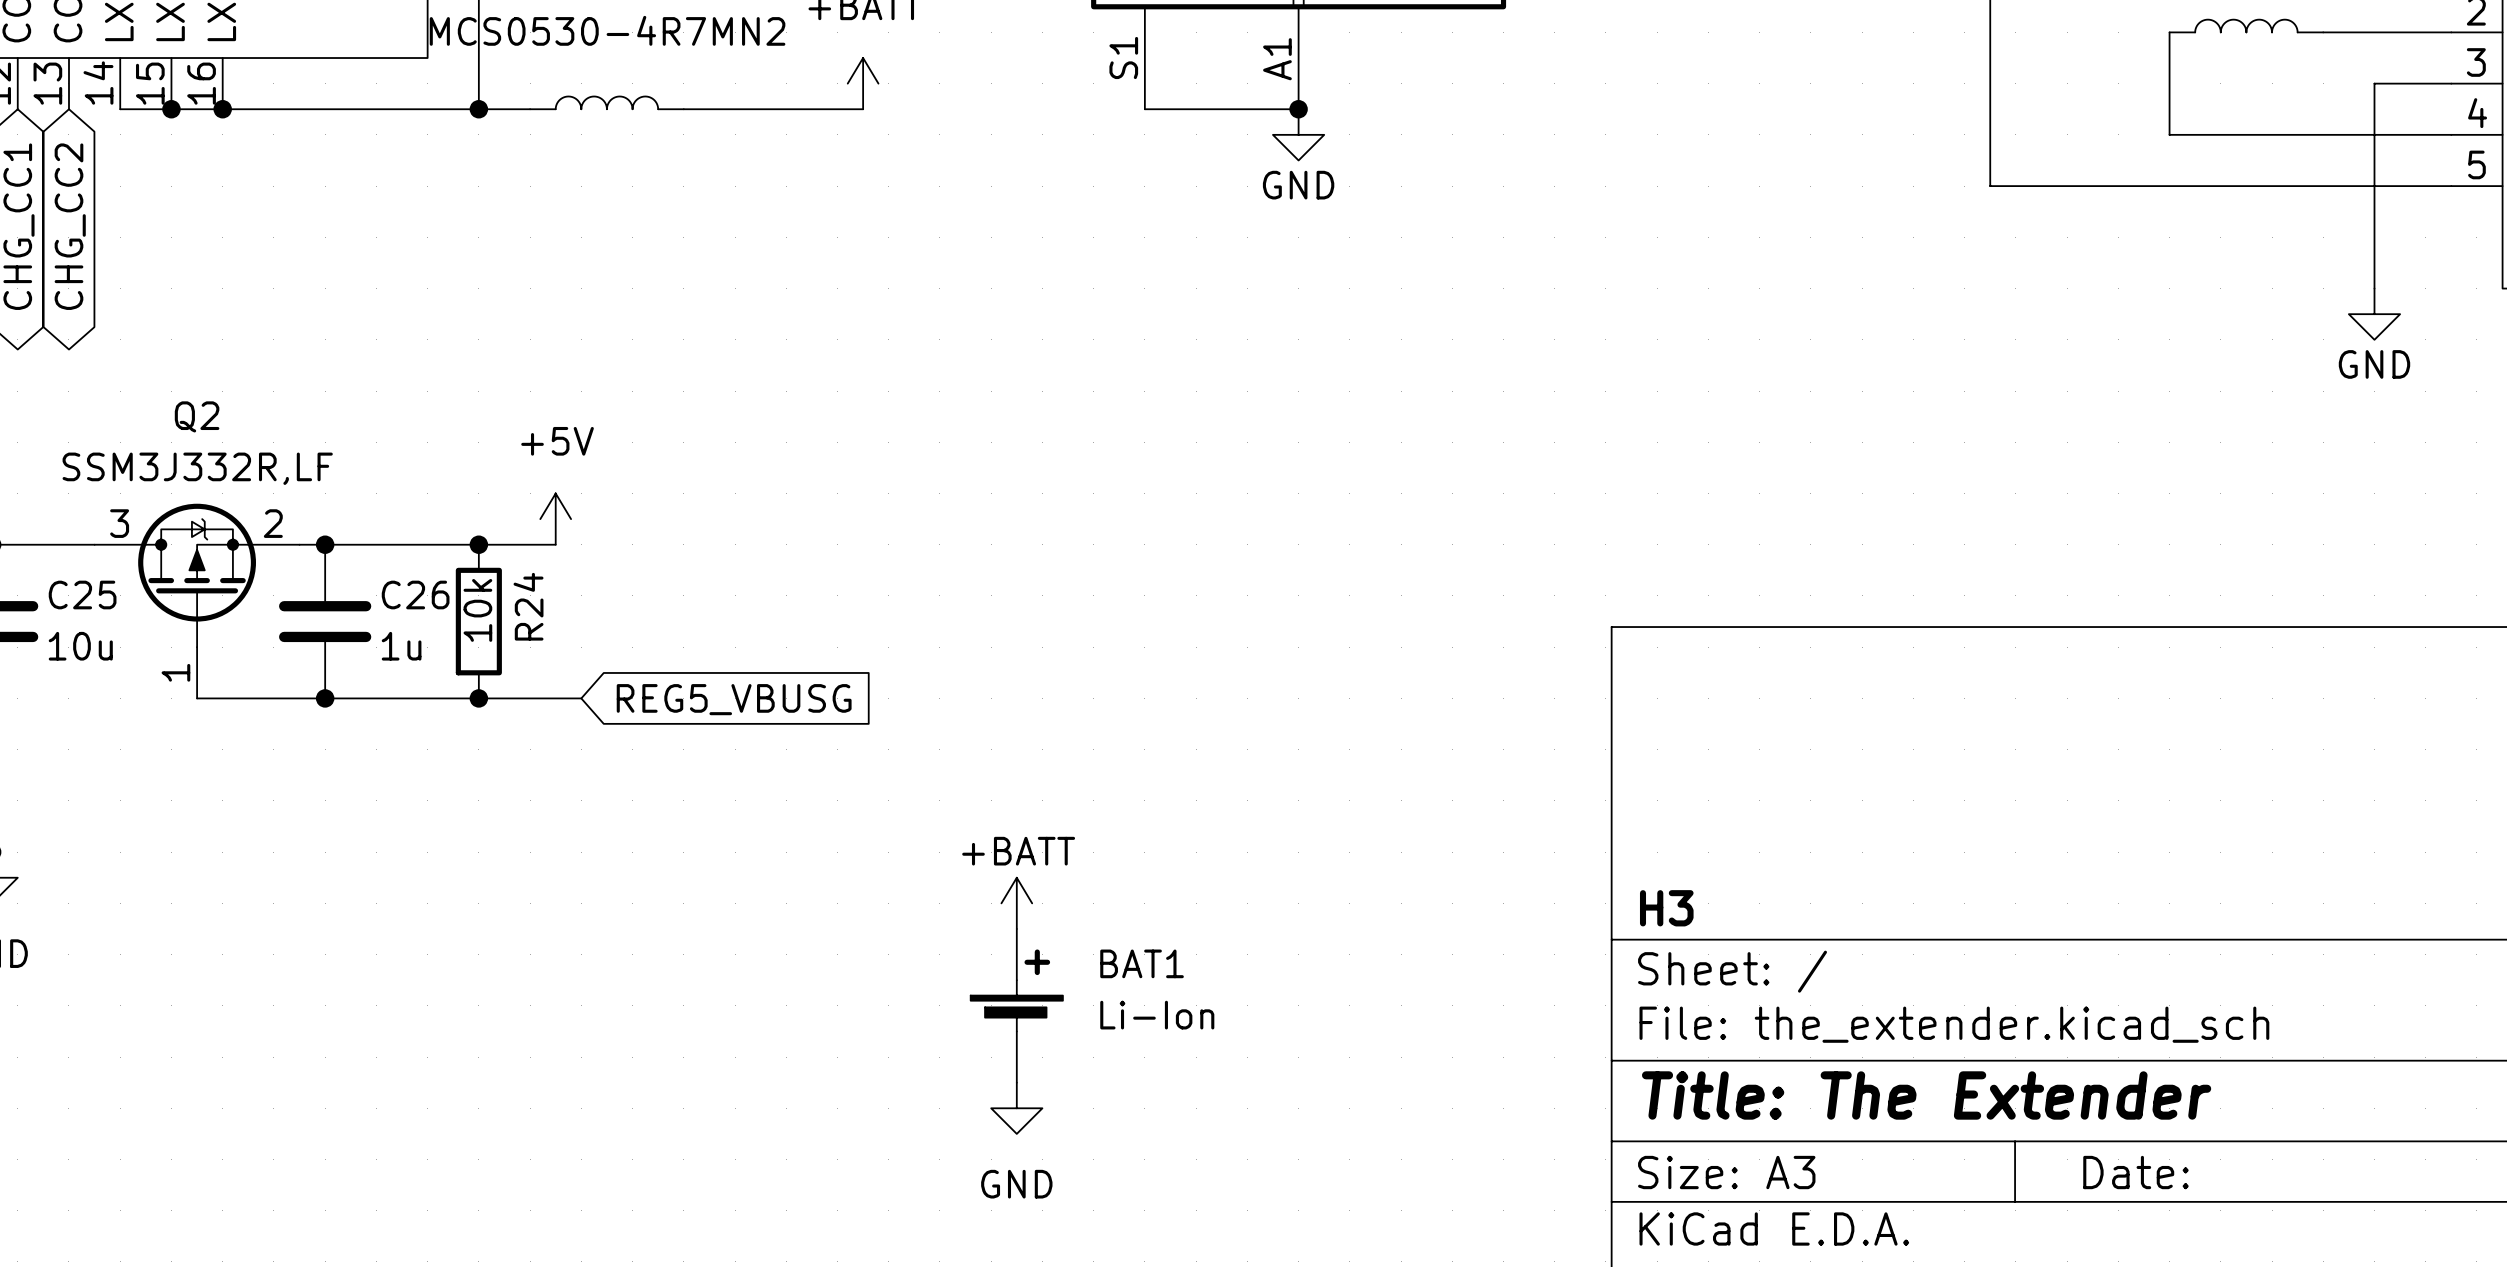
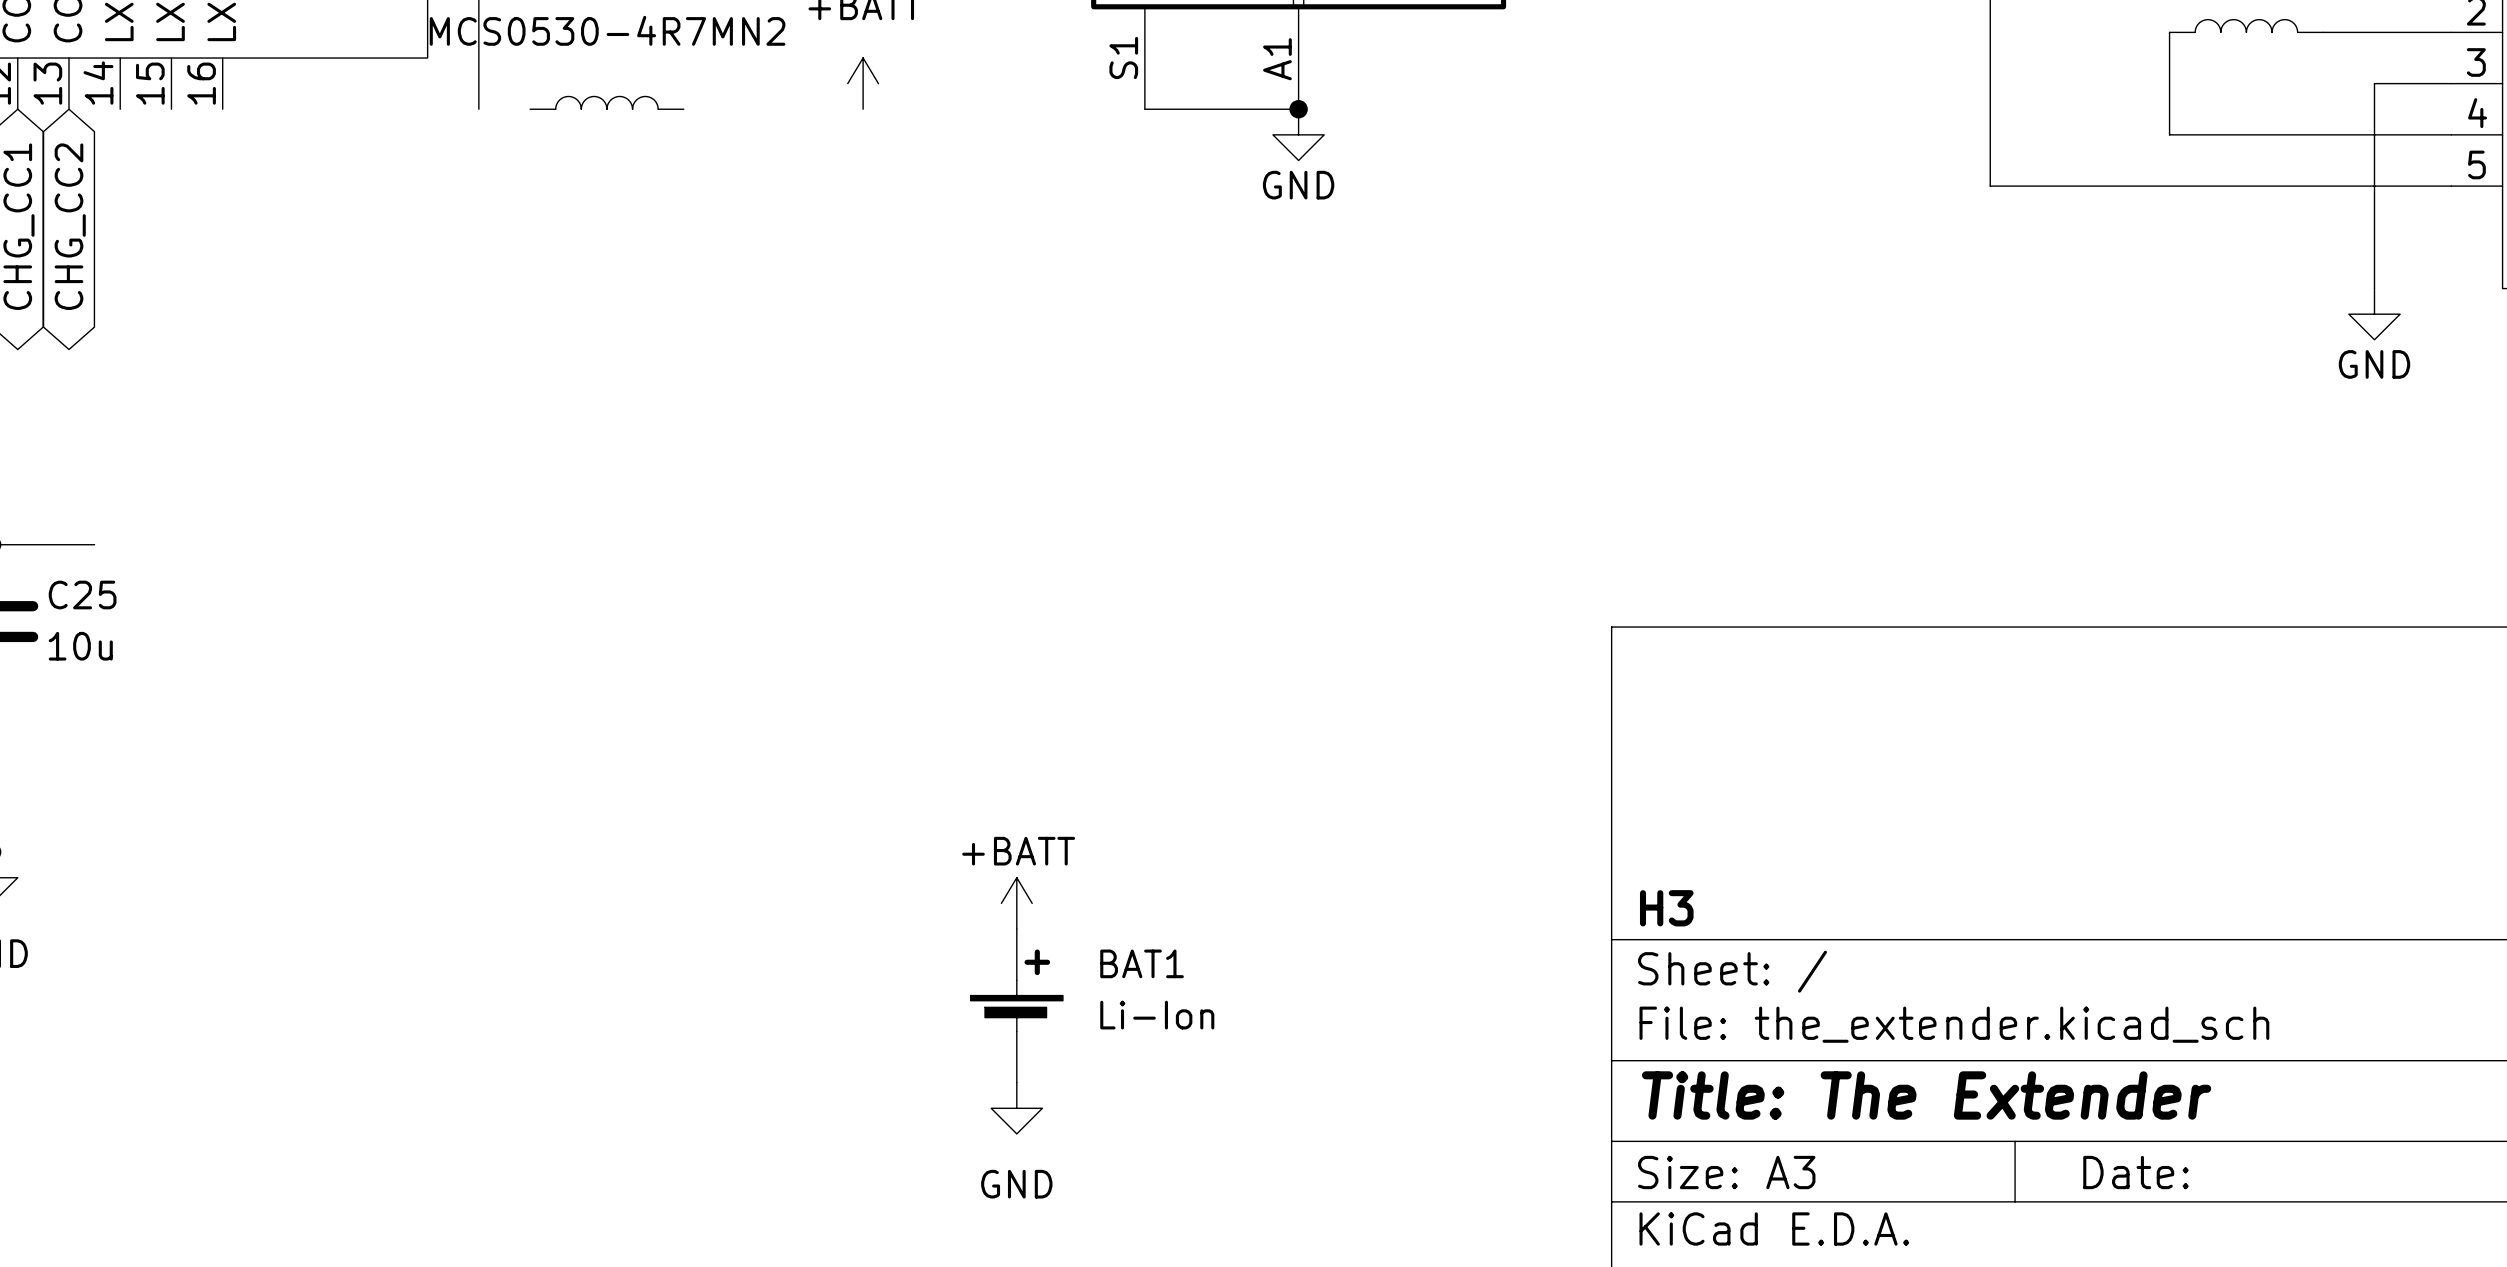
wire: (120, 109) (530, 109) -> none
junction: (171, 109) -> none
junction: (222, 109) -> none
junction: (478, 109) -> none
wire: (683, 109) (863, 109) -> none
power symbol: +5V (555, 519) -> none
wire: (299, 544) (555, 544) -> none
junction: (325, 544) -> none
junction: (478, 544) -> none
Q2: SSM3J332R,LF (197, 601) -> none
C26: 1u (325, 621) -> none
R24: 10k (478, 621) -> none
wire: (197, 698) (581, 698) -> none
junction: (325, 698) -> none
junction: (478, 698) -> none
global label: REG5_VBUSG (734, 699) -> none

